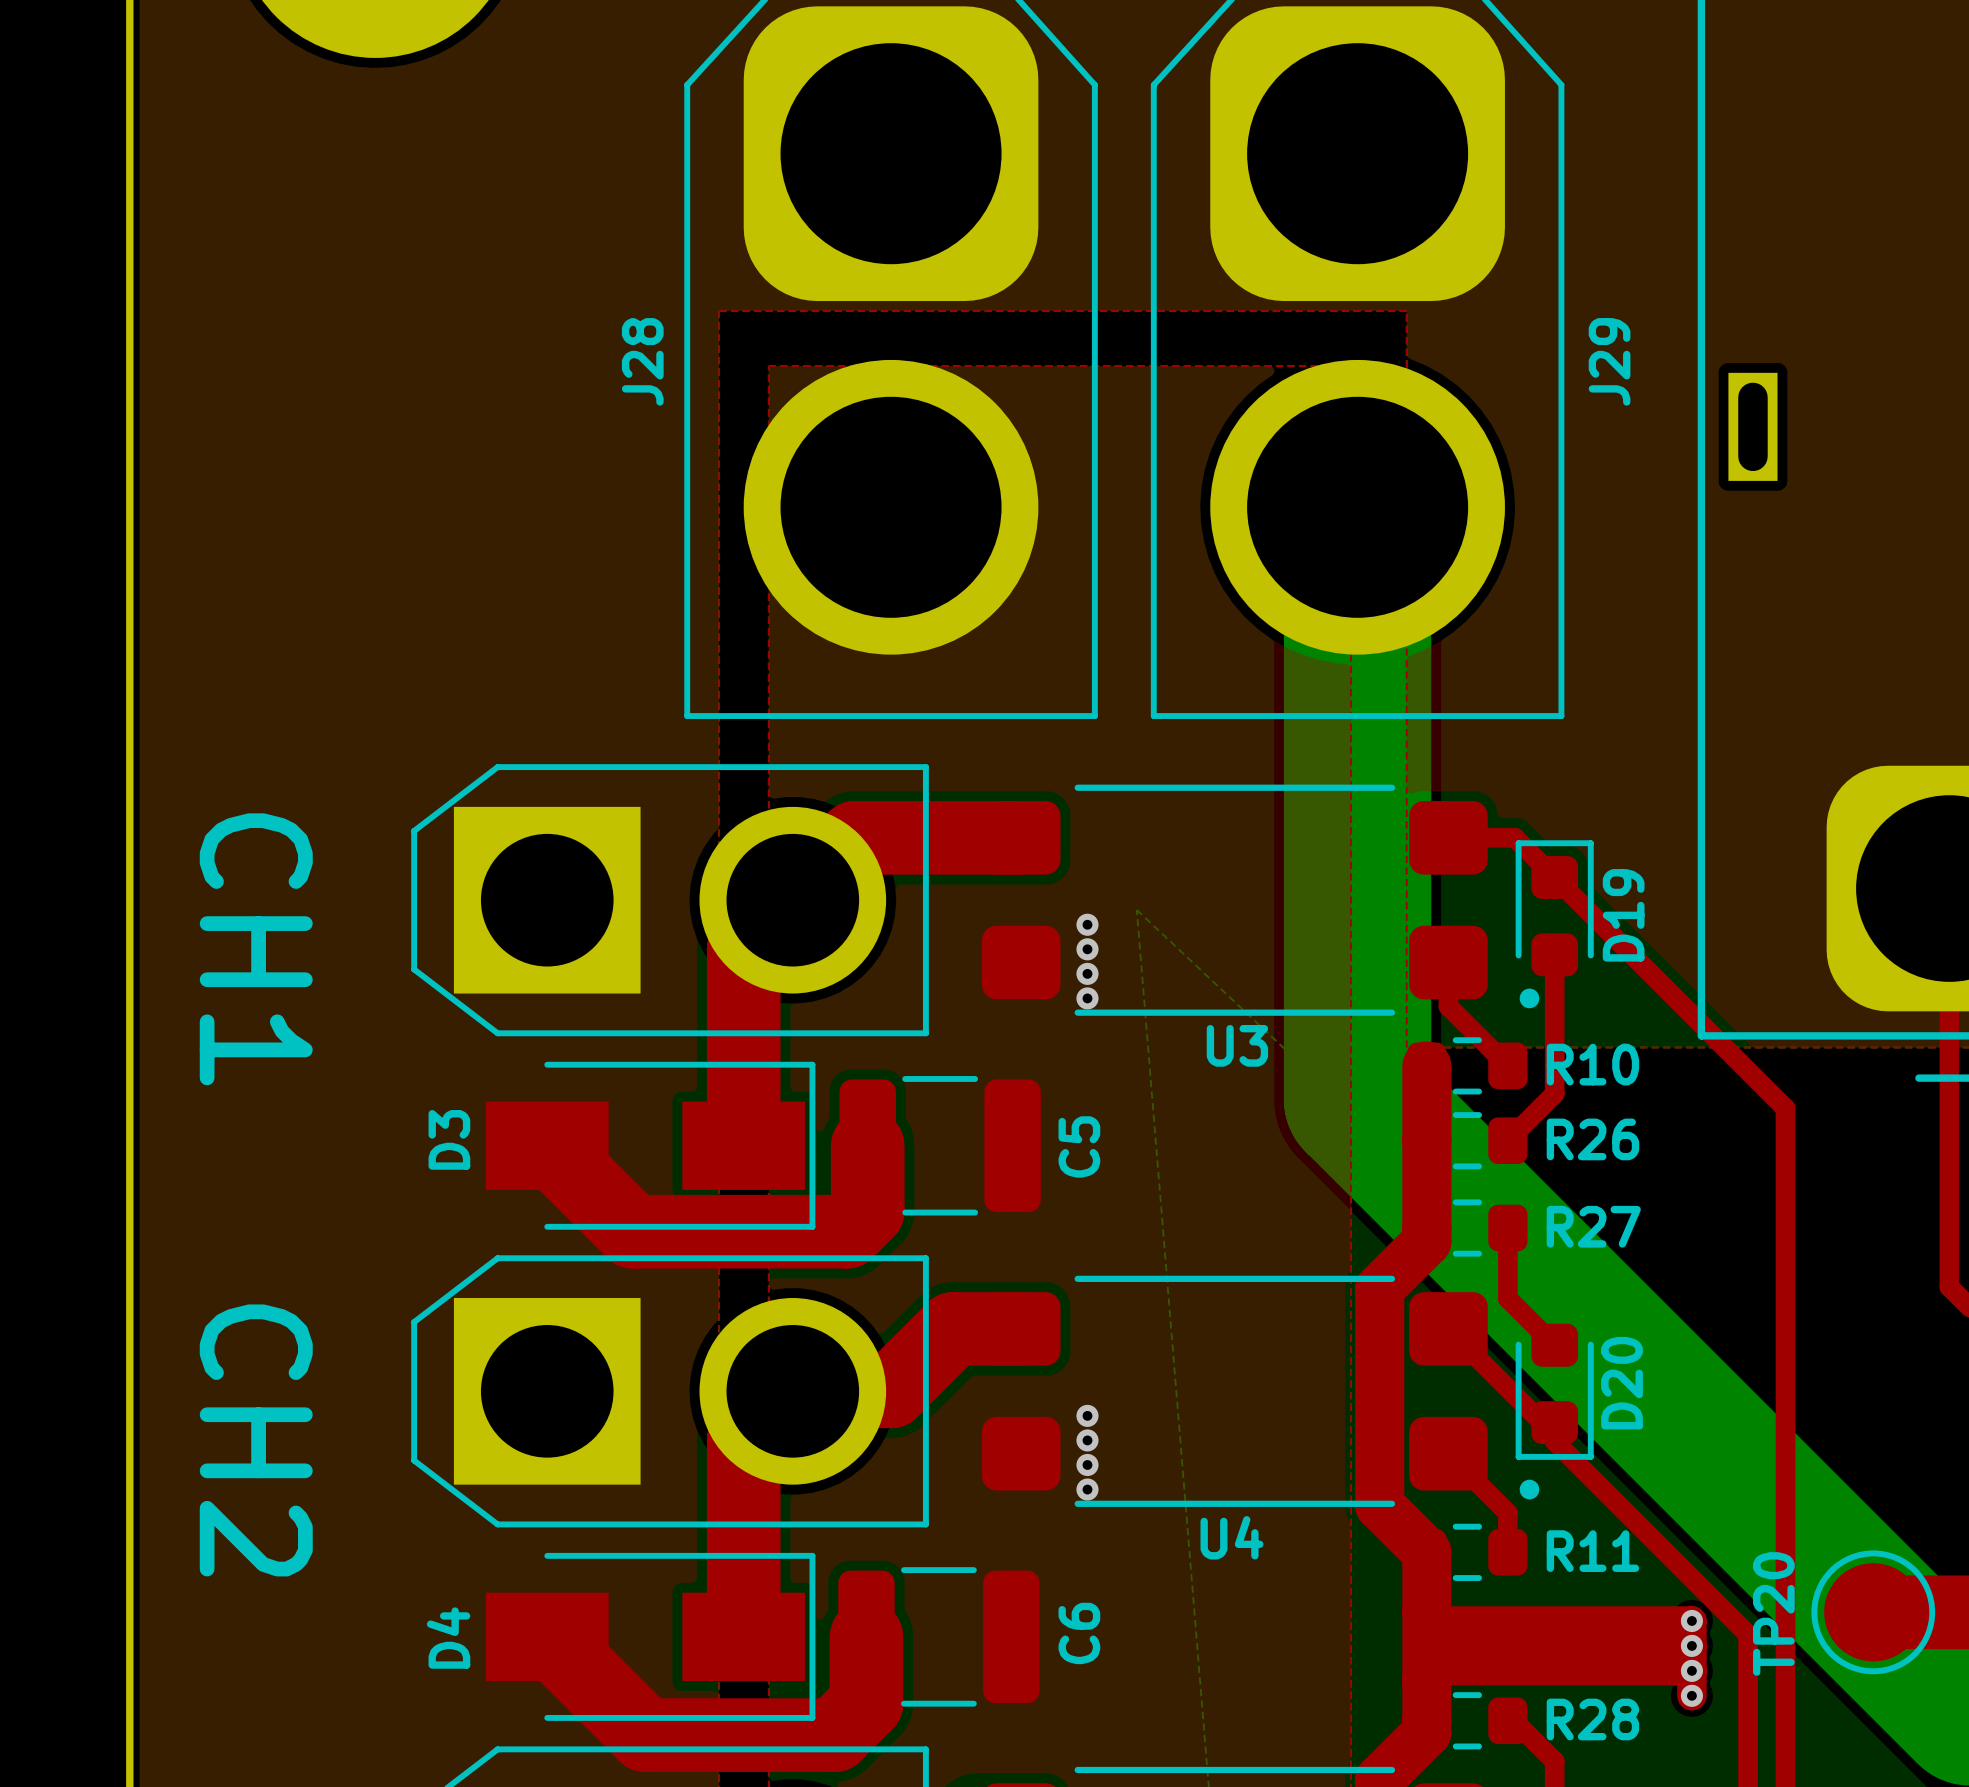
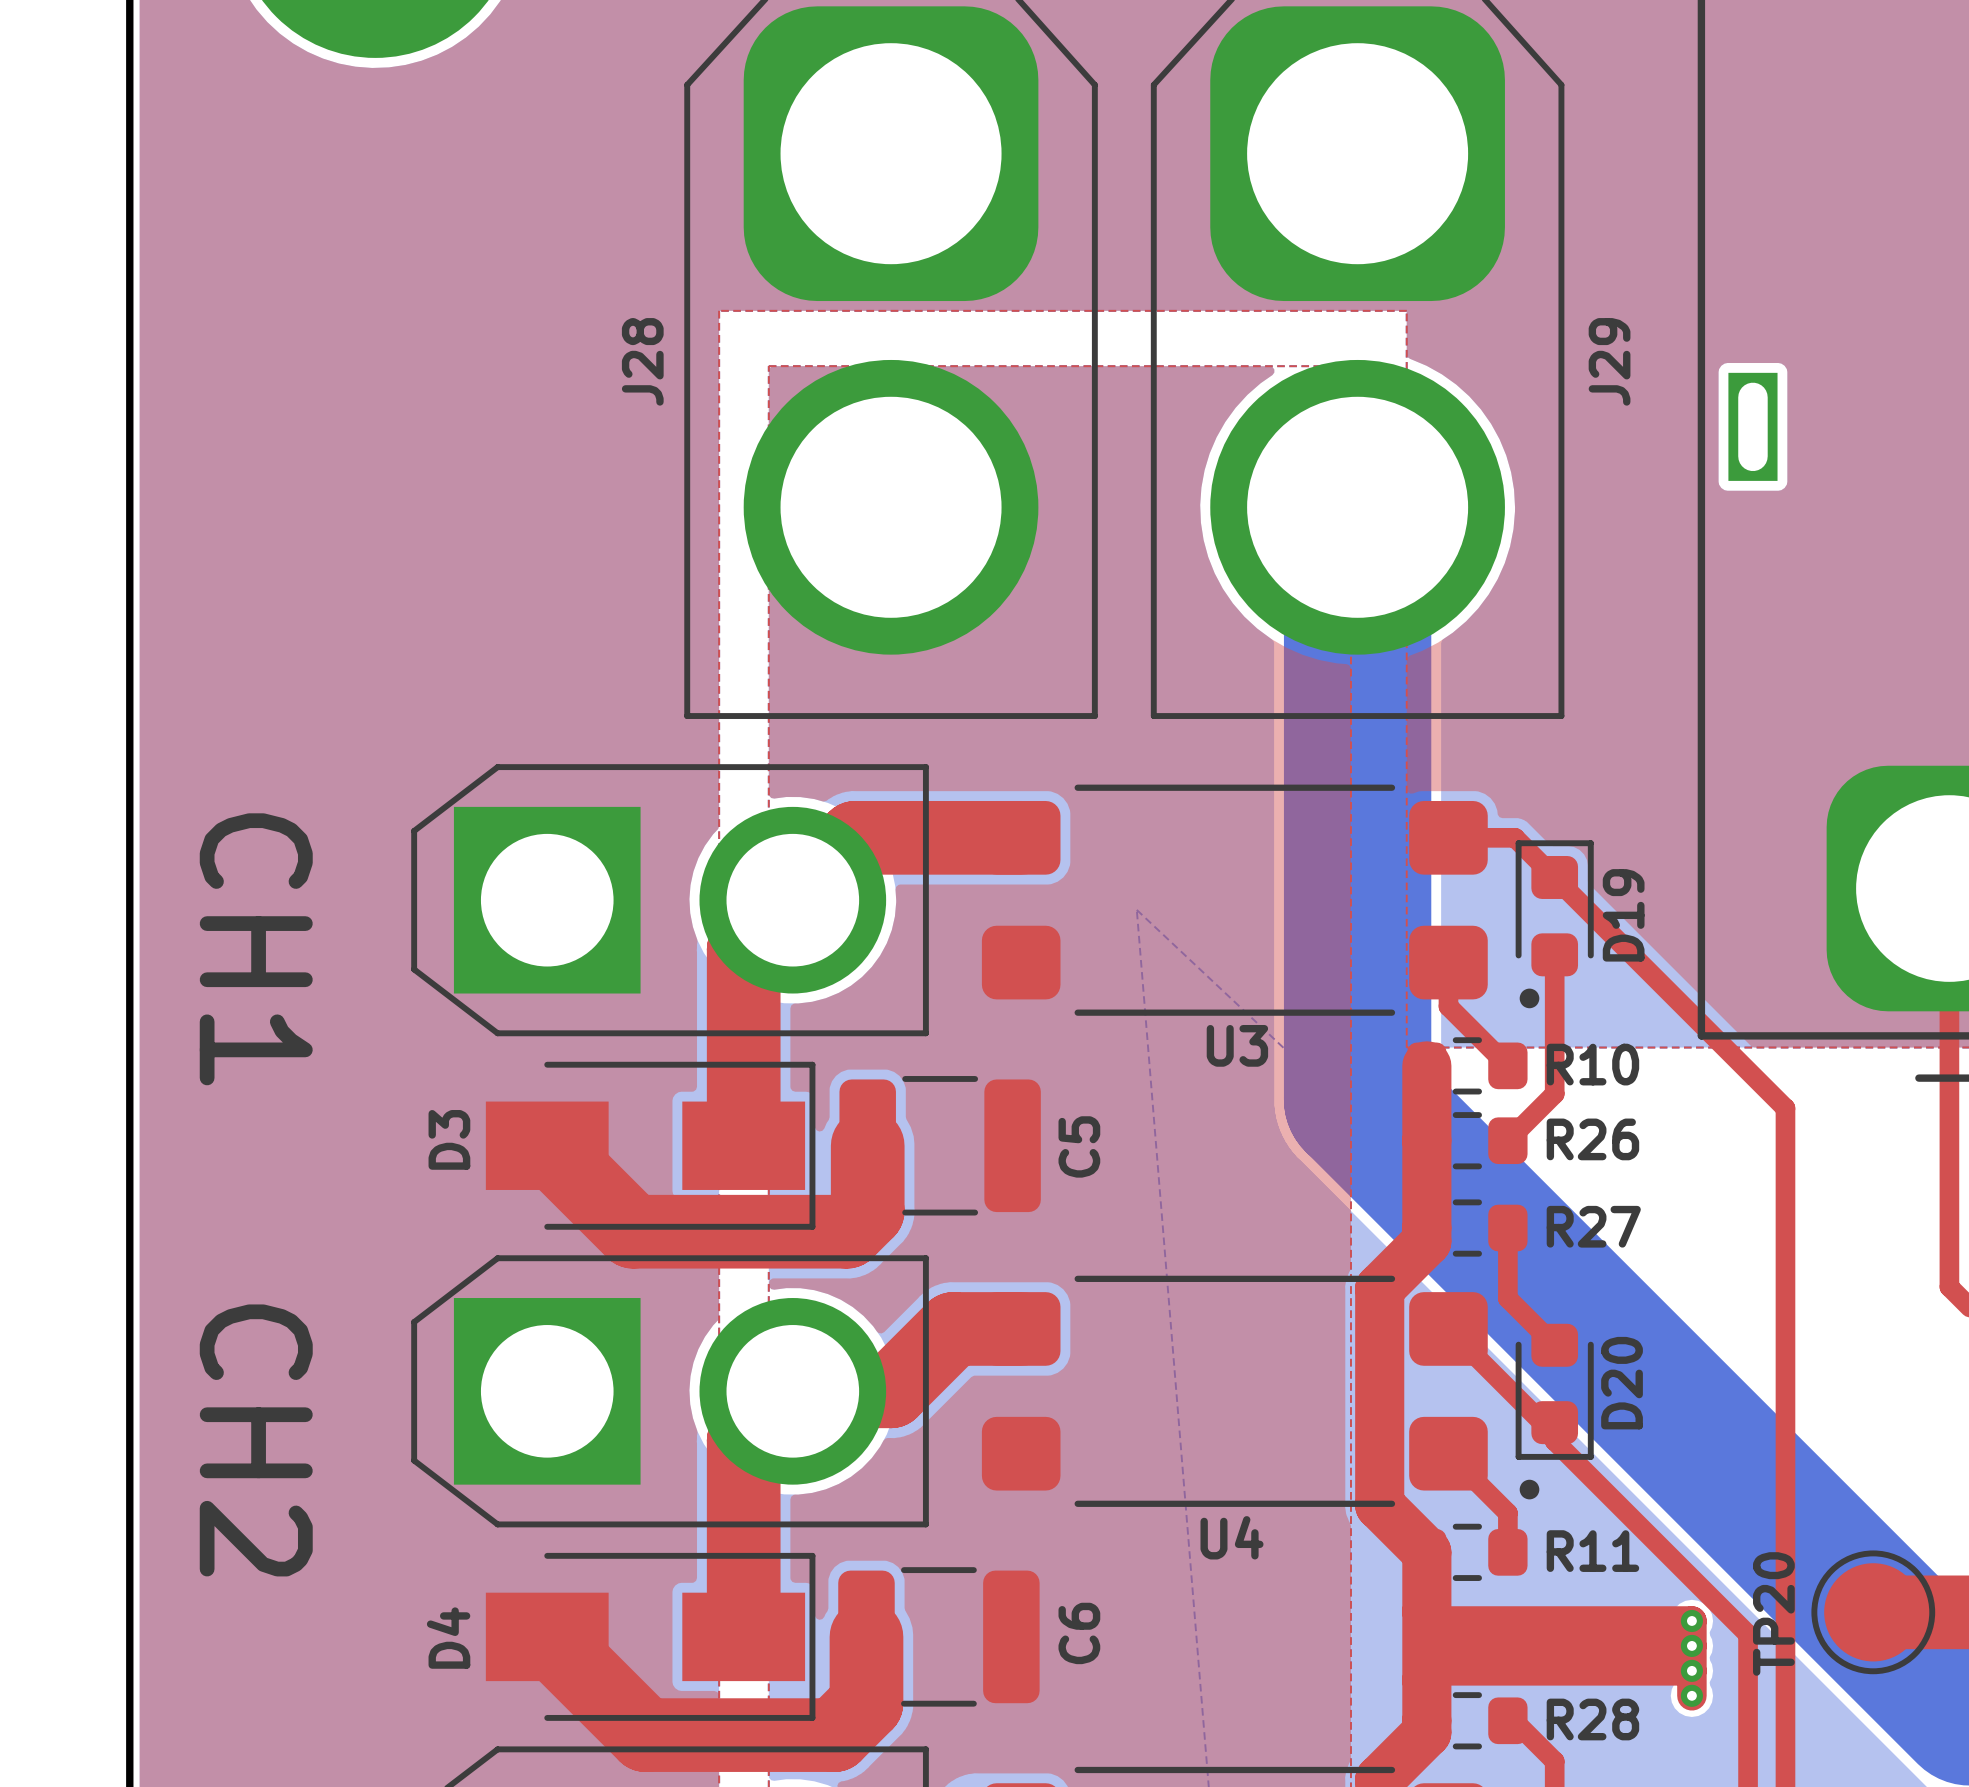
via: (1087, 924) -> none
via: (1087, 949) -> none
via: (1087, 973) -> none
via: (1087, 998) -> none
via: (1087, 1415) -> none
via: (1087, 1440) -> none
via: (1087, 1464) -> none
via: (1087, 1489) -> none

